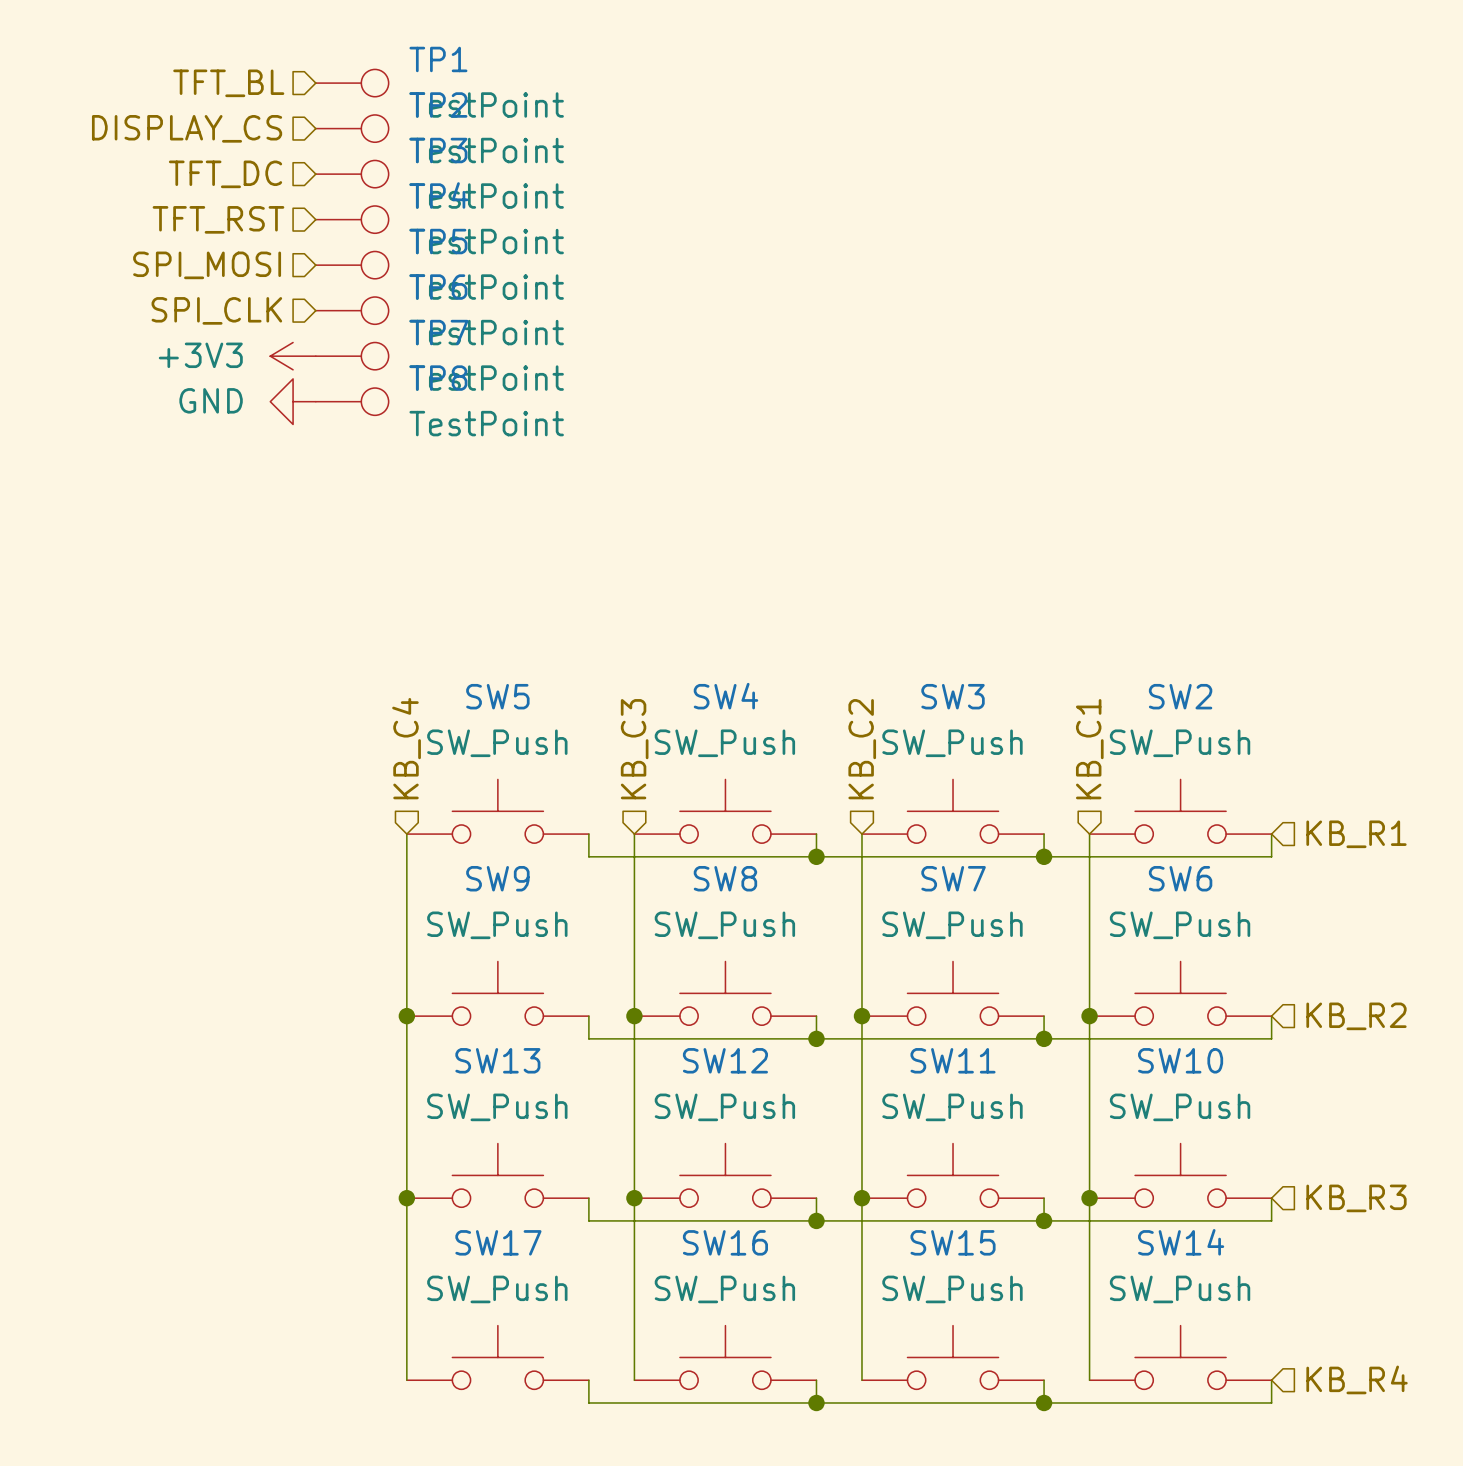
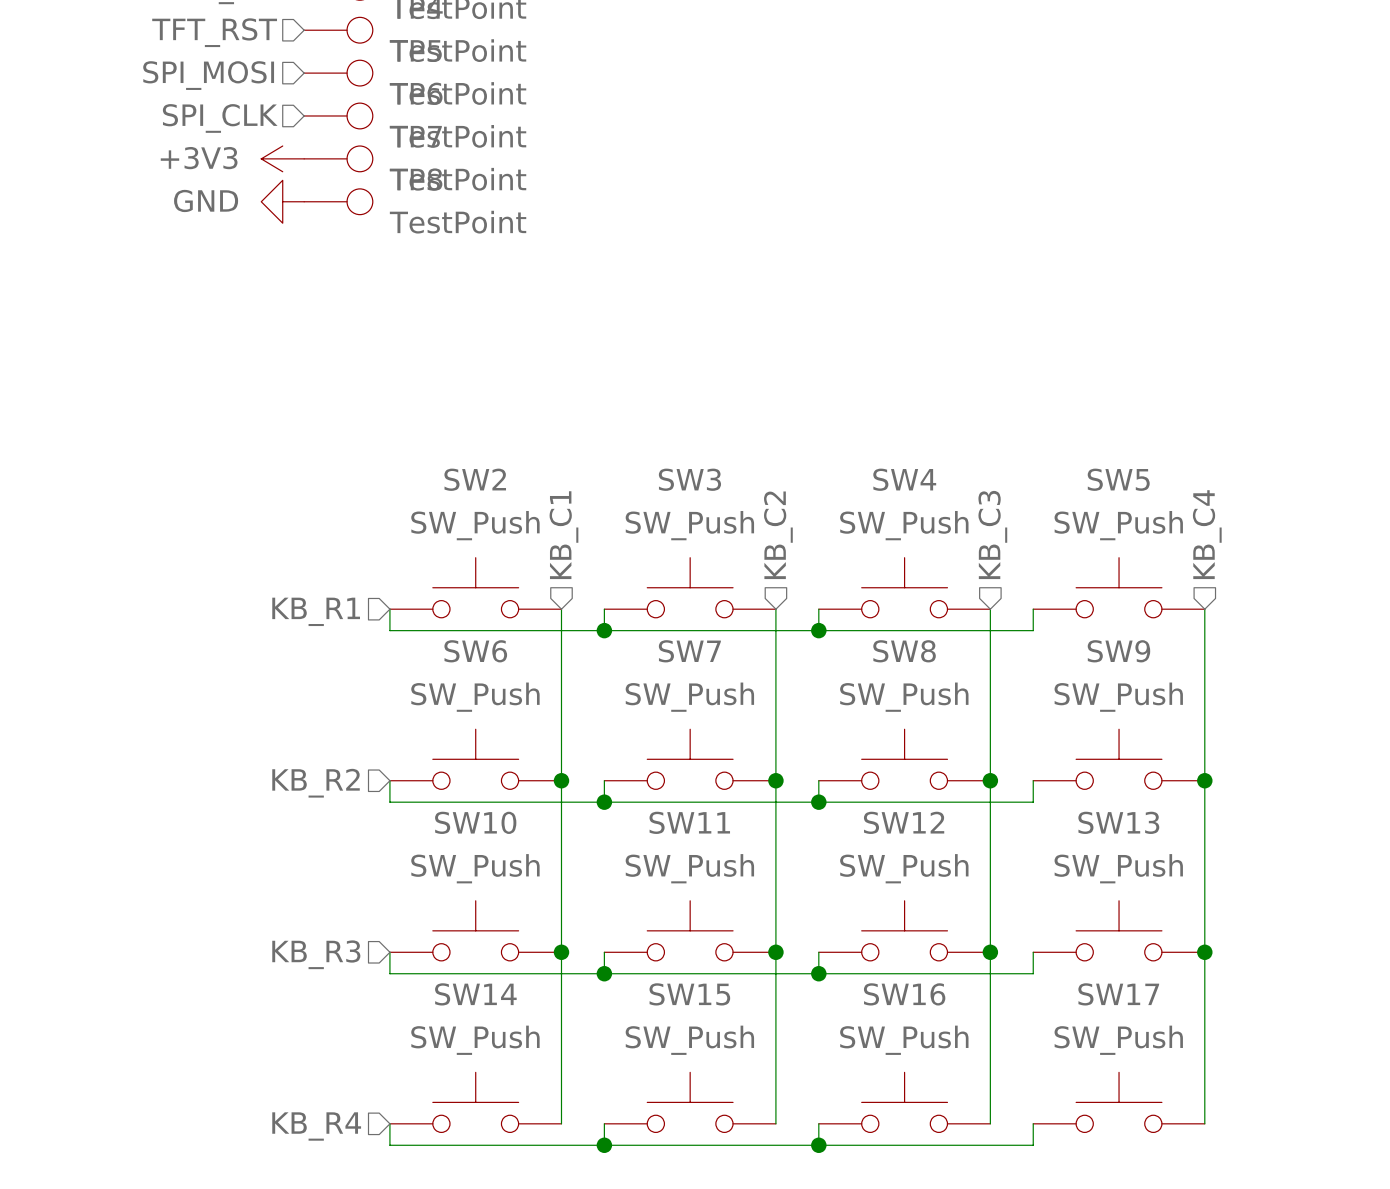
SW5 name: SW5 (497, 696) -> SW2 (475, 479)
SW4 name: SW4 (725, 696) -> SW3 (689, 479)
SW3 name: SW3 (953, 696) -> SW4 (904, 479)
SW2 name: SW2 (1180, 696) -> SW5 (1118, 479)
hierarchical label: KB_C4 (406, 748) -> none
hierarchical label: none -> KB_C4 (1207, 534)
hierarchical label: none -> KB_C1 (563, 535)
hierarchical label position: KB_C3 (634, 749) -> KB_C3 (992, 534)
hierarchical label position: KB_C2 (862, 749) -> KB_C2 (778, 535)
hierarchical label: KB_C1 (1089, 749) -> none
hierarchical label: none -> KB_R1 (316, 611)
hierarchical label: KB_R1 (1356, 834) -> none
wire: (406, 856) (406, 1016) -> (389, 630) (561, 630) (561, 780)
wire: (634, 856) (634, 1016) -> (990, 630) (990, 780)
junction: none -> (604, 630)
junction position: (816, 856) -> (818, 630)
wire: (861, 856) (861, 1016) -> (775, 630) (775, 780)
junction: (1044, 856) -> none
wire: (1271, 856) (1089, 856) (1089, 1016) -> (1204, 630) (1204, 780)
SW9 name: SW9 (497, 878) -> SW6 (475, 651)
SW8 name: SW8 (725, 878) -> SW7 (689, 651)
SW7 name: SW7 (953, 878) -> SW8 (904, 651)
SW6 name: SW6 (1180, 878) -> SW9 (1118, 651)
hierarchical label: none -> KB_R2 (316, 783)
junction: (406, 1016) -> none
junction: none -> (561, 780)
junction: (634, 1016) -> none
junction: none -> (775, 780)
junction: (861, 1016) -> none
junction: none -> (990, 780)
junction: (1089, 1016) -> none
junction: none -> (1204, 780)
hierarchical label: KB_R2 (1356, 1016) -> none
wire: (406, 1038) (406, 1198) -> (389, 802) (561, 802) (561, 952)
wire: (634, 1038) (634, 1198) -> (990, 802) (990, 952)
junction: none -> (604, 802)
junction: (816, 1038) -> none
wire: (861, 1038) (861, 1198) -> (775, 802) (775, 952)
junction: none -> (818, 802)
junction: (1044, 1038) -> none
wire: (1271, 1038) (1089, 1038) (1089, 1198) -> (1204, 802) (1204, 952)
SW13 name: SW13 (497, 1060) -> SW10 (475, 822)
SW12 name: SW12 (725, 1060) -> SW11 (689, 822)
SW11 name: SW11 (953, 1060) -> SW12 (904, 822)
SW10 name: SW10 (1180, 1060) -> SW13 (1118, 822)
hierarchical label: none -> KB_R3 (316, 954)
junction: (406, 1198) -> none
junction: none -> (561, 952)
junction: (634, 1198) -> none
junction: none -> (775, 952)
junction: (861, 1198) -> none
junction: none -> (990, 952)
junction: (1089, 1198) -> none
junction: none -> (1204, 952)
hierarchical label: KB_R3 (1356, 1198) -> none
wire: (406, 1220) (406, 1380) -> (389, 973) (561, 973) (561, 1123)
wire: (634, 1220) (634, 1380) -> (604, 1145) (604, 1123)
junction: none -> (604, 973)
junction: (816, 1220) -> none
wire: (861, 1220) (861, 1380) -> (818, 1145) (818, 1123)
junction: none -> (818, 973)
junction: (1044, 1220) -> none
wire: (1271, 1220) (1089, 1220) (1089, 1380) -> (1204, 973) (1204, 1123)
SW17 name: SW17 (498, 1242) -> SW14 (475, 994)
SW16 name: SW16 (725, 1242) -> SW15 (689, 994)
SW15 name: SW15 (953, 1242) -> SW16 (904, 994)
SW14 name: SW14 (1181, 1242) -> SW17 (1118, 994)
hierarchical label: none -> KB_R4 (316, 1126)
hierarchical label: KB_R4 (1357, 1379) -> none
wire: (588, 1380) (588, 1402) -> (389, 1123) (389, 1145) (561, 1145)
wire: (816, 1380) (816, 1402) -> (775, 1123) (775, 973)
wire: (1044, 1380) (1044, 1402) -> (990, 1123) (990, 973)
wire: (1271, 1380) (1271, 1402) (1089, 1402) -> (1033, 1123) (1033, 1145)
junction: none -> (604, 1145)
junction position: (816, 1402) -> (818, 1145)
junction: (1044, 1402) -> none

